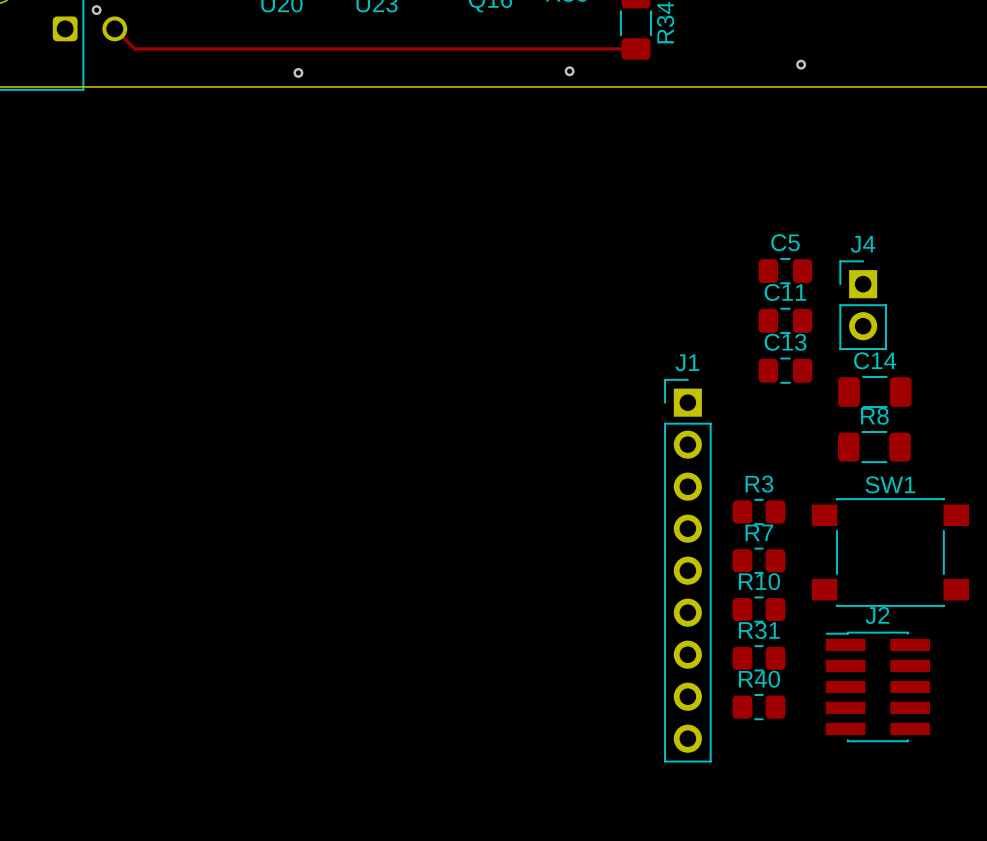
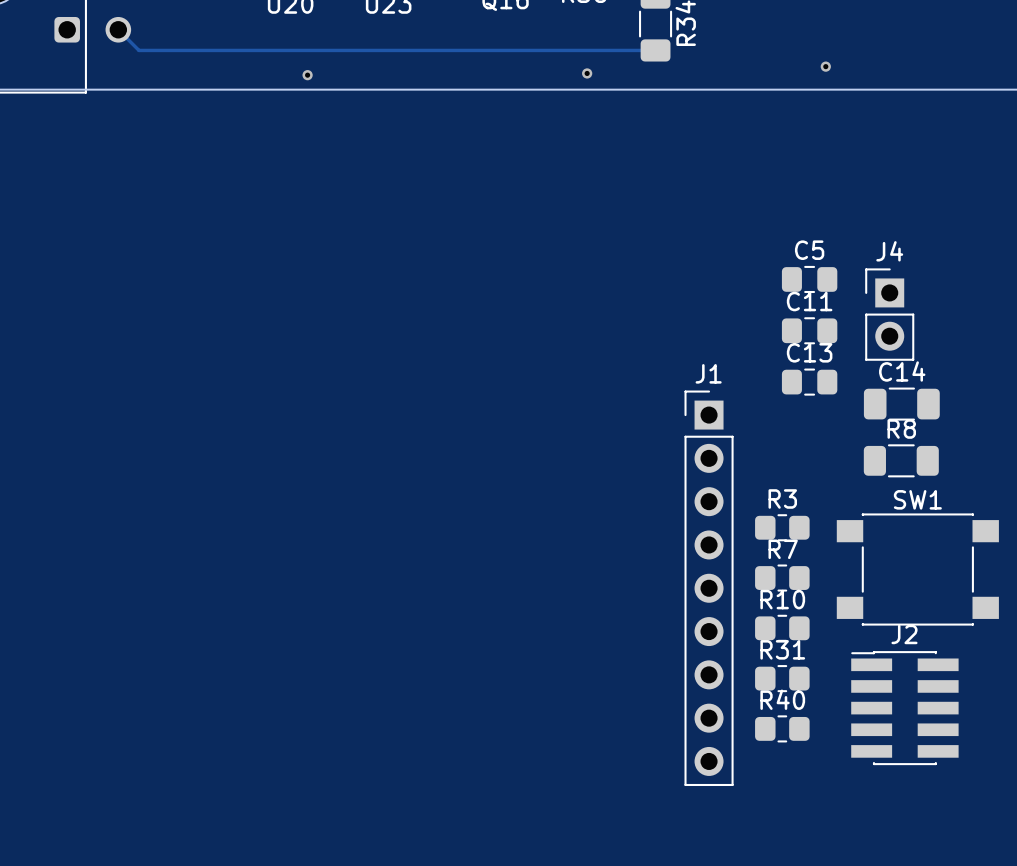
via: (96, 10) -> none

